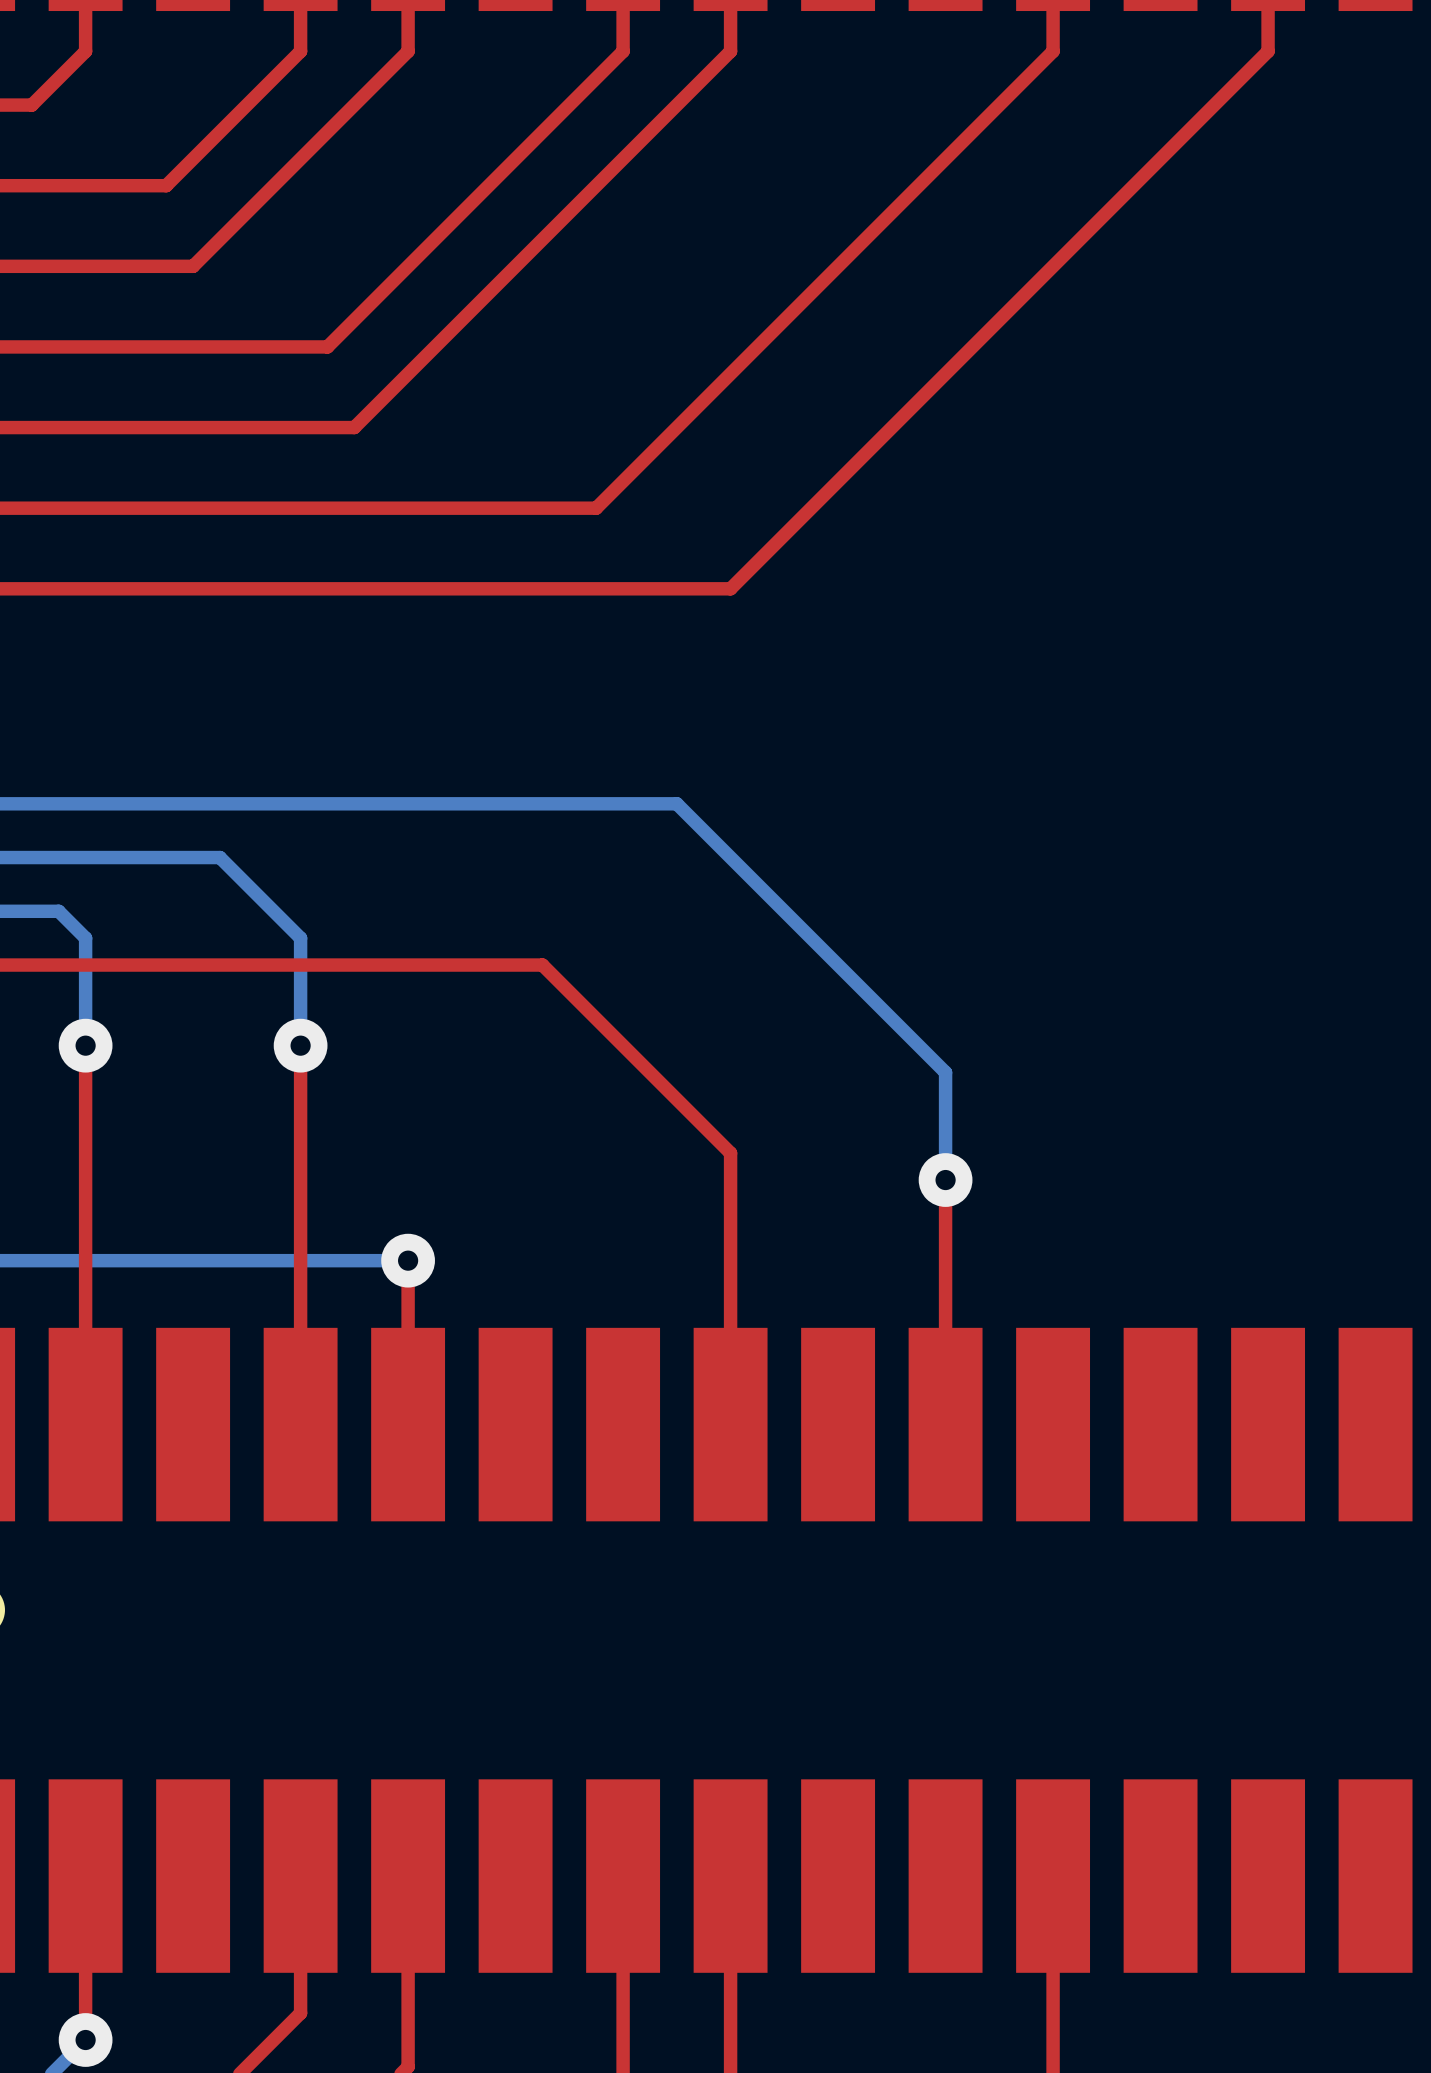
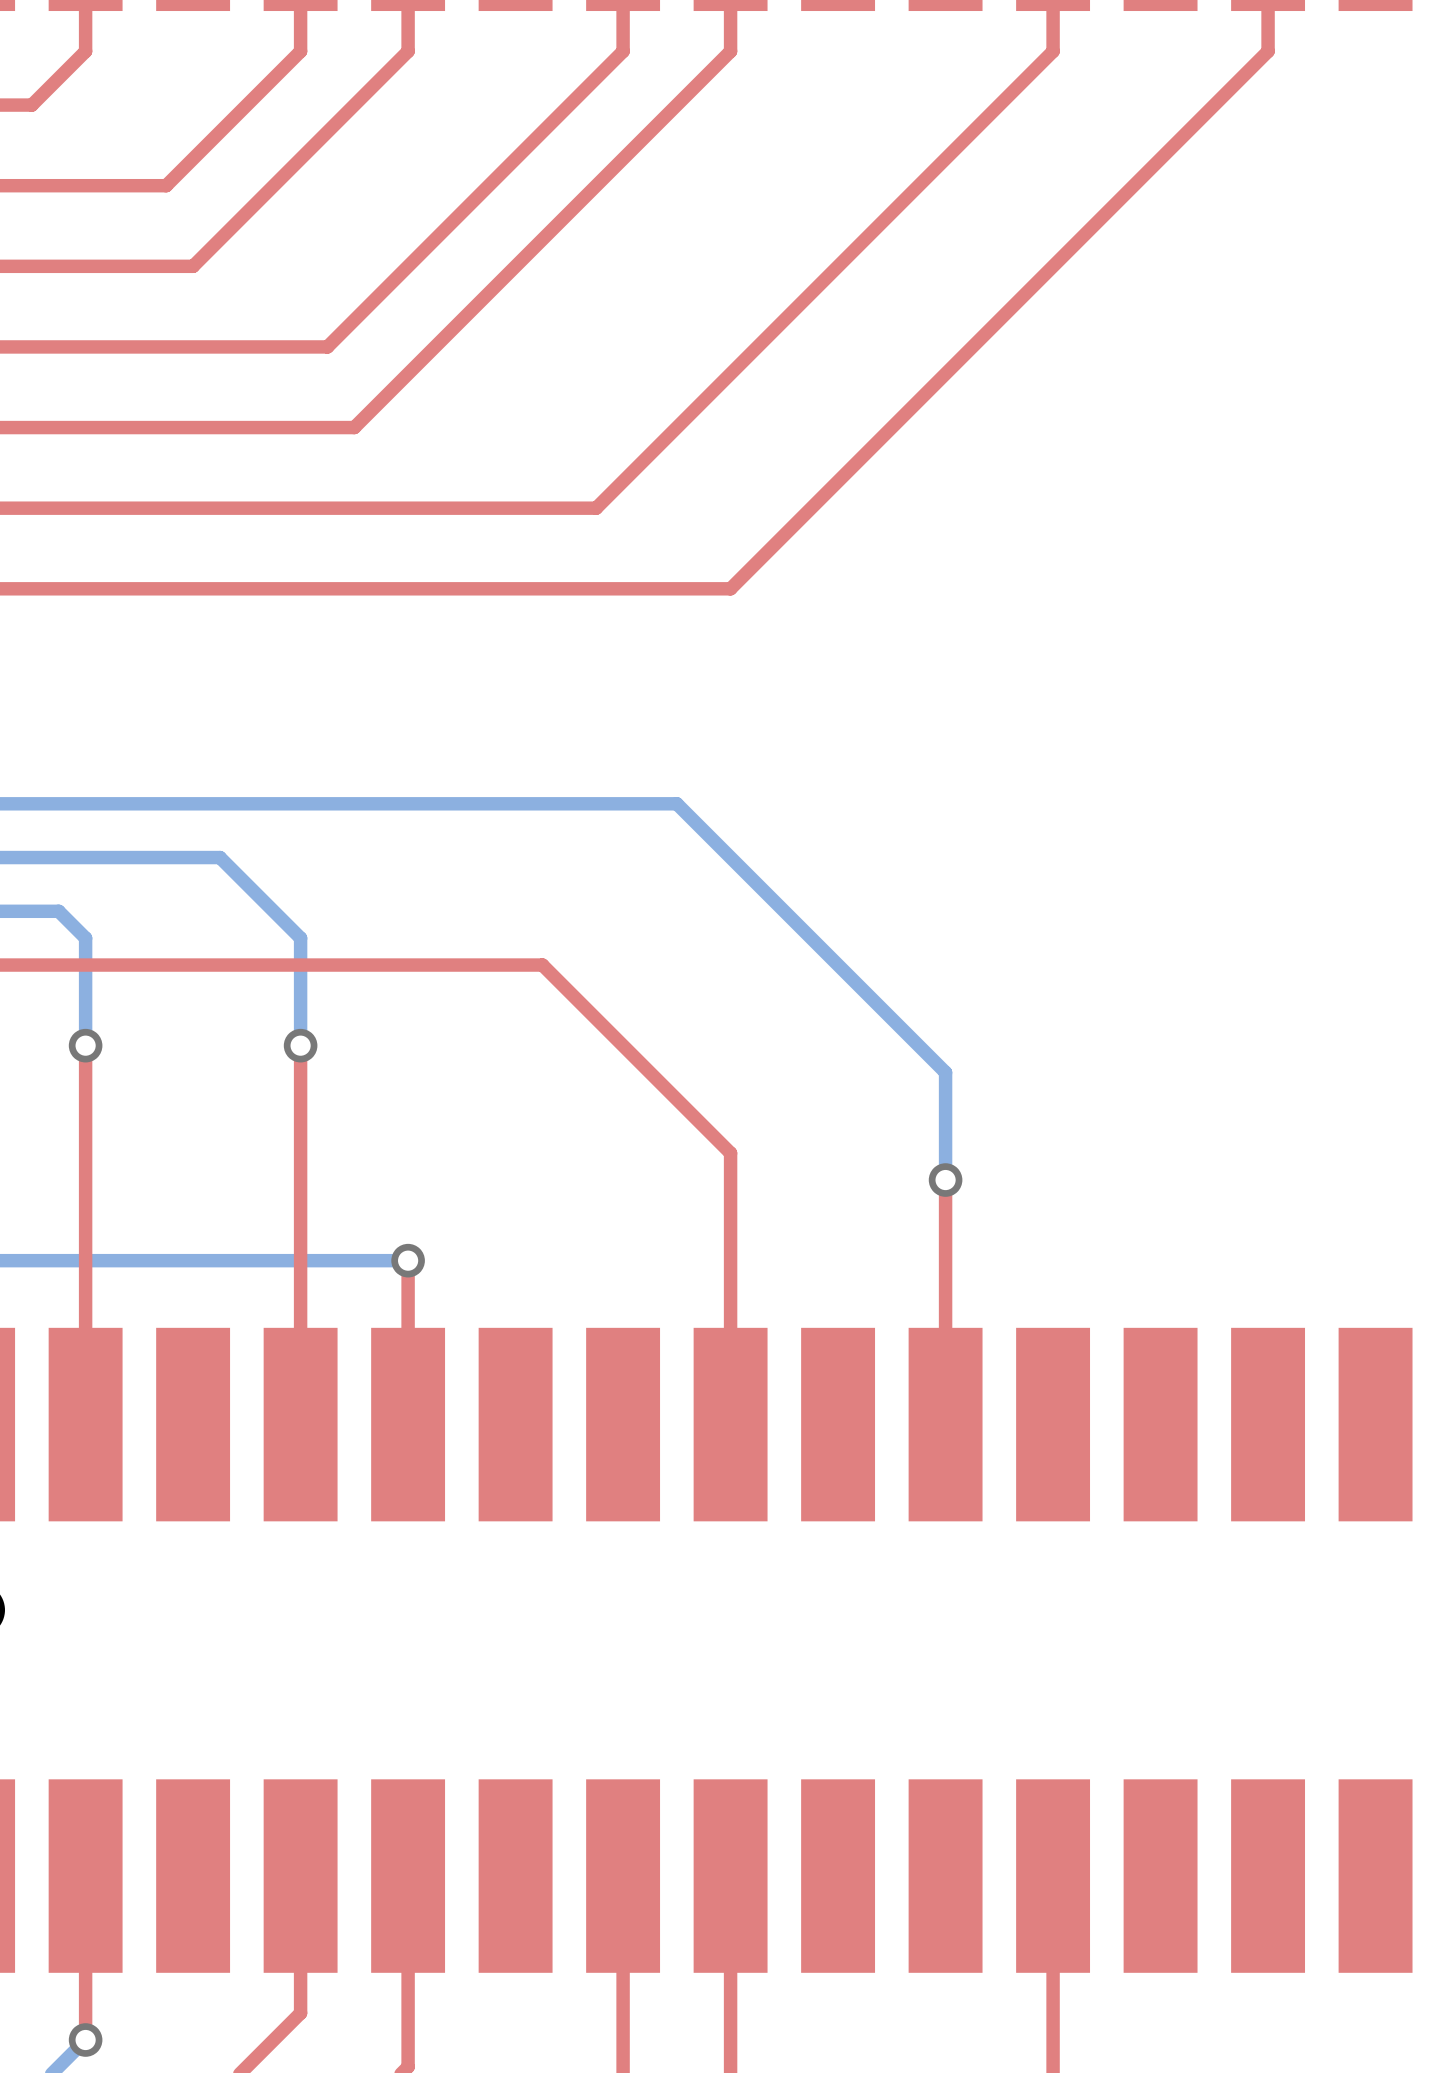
via size: [58, 1018, 113, 1073] -> [68, 1028, 103, 1063]
via size: [273, 1018, 328, 1073] -> [283, 1028, 318, 1063]
via size: [918, 1153, 973, 1207] -> [928, 1163, 963, 1197]
via size: [381, 1233, 435, 1288] -> [391, 1243, 425, 1278]
via size: [58, 2013, 113, 2067] -> [68, 2023, 103, 2057]

